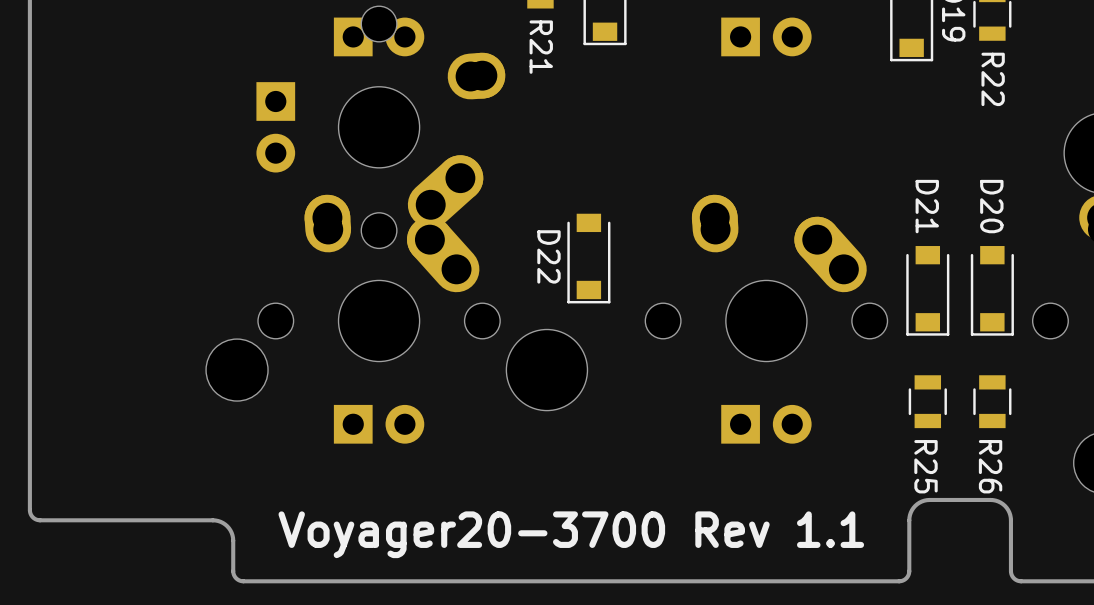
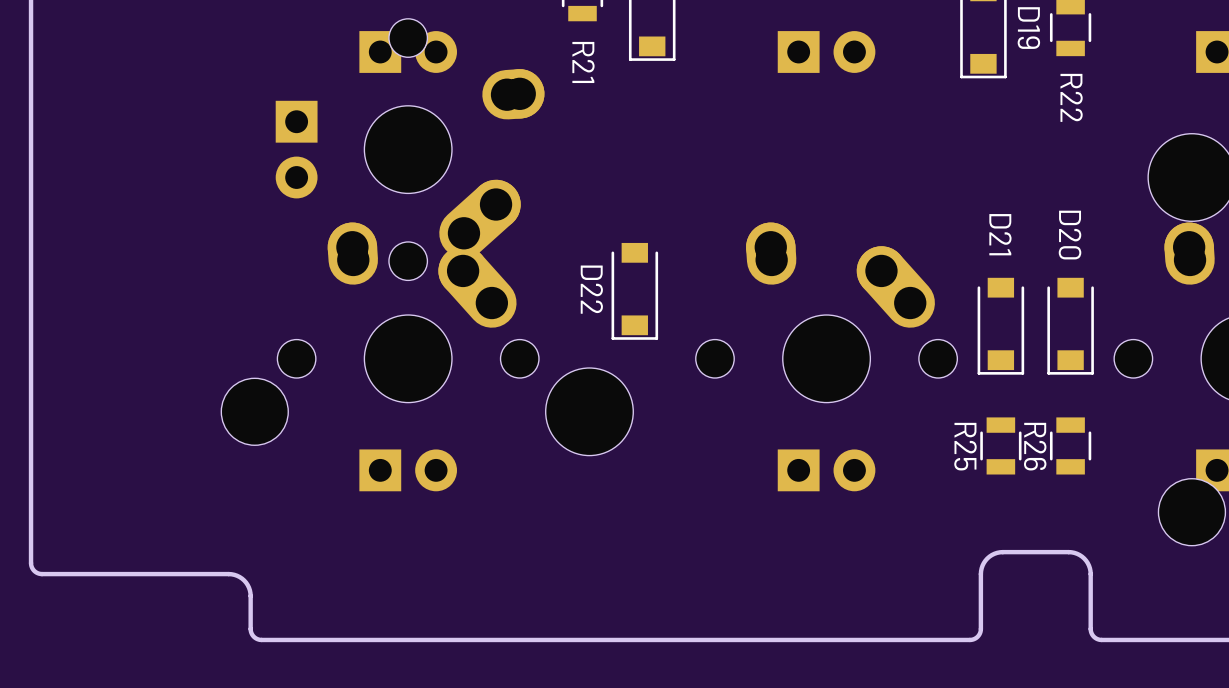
R25 name position: R25 (926, 466) -> R25 (965, 446)
R26 name position: R26 (990, 466) -> R26 (1035, 446)
text: Voyager20-3700 Rev 1.1 (571, 534) -> none

